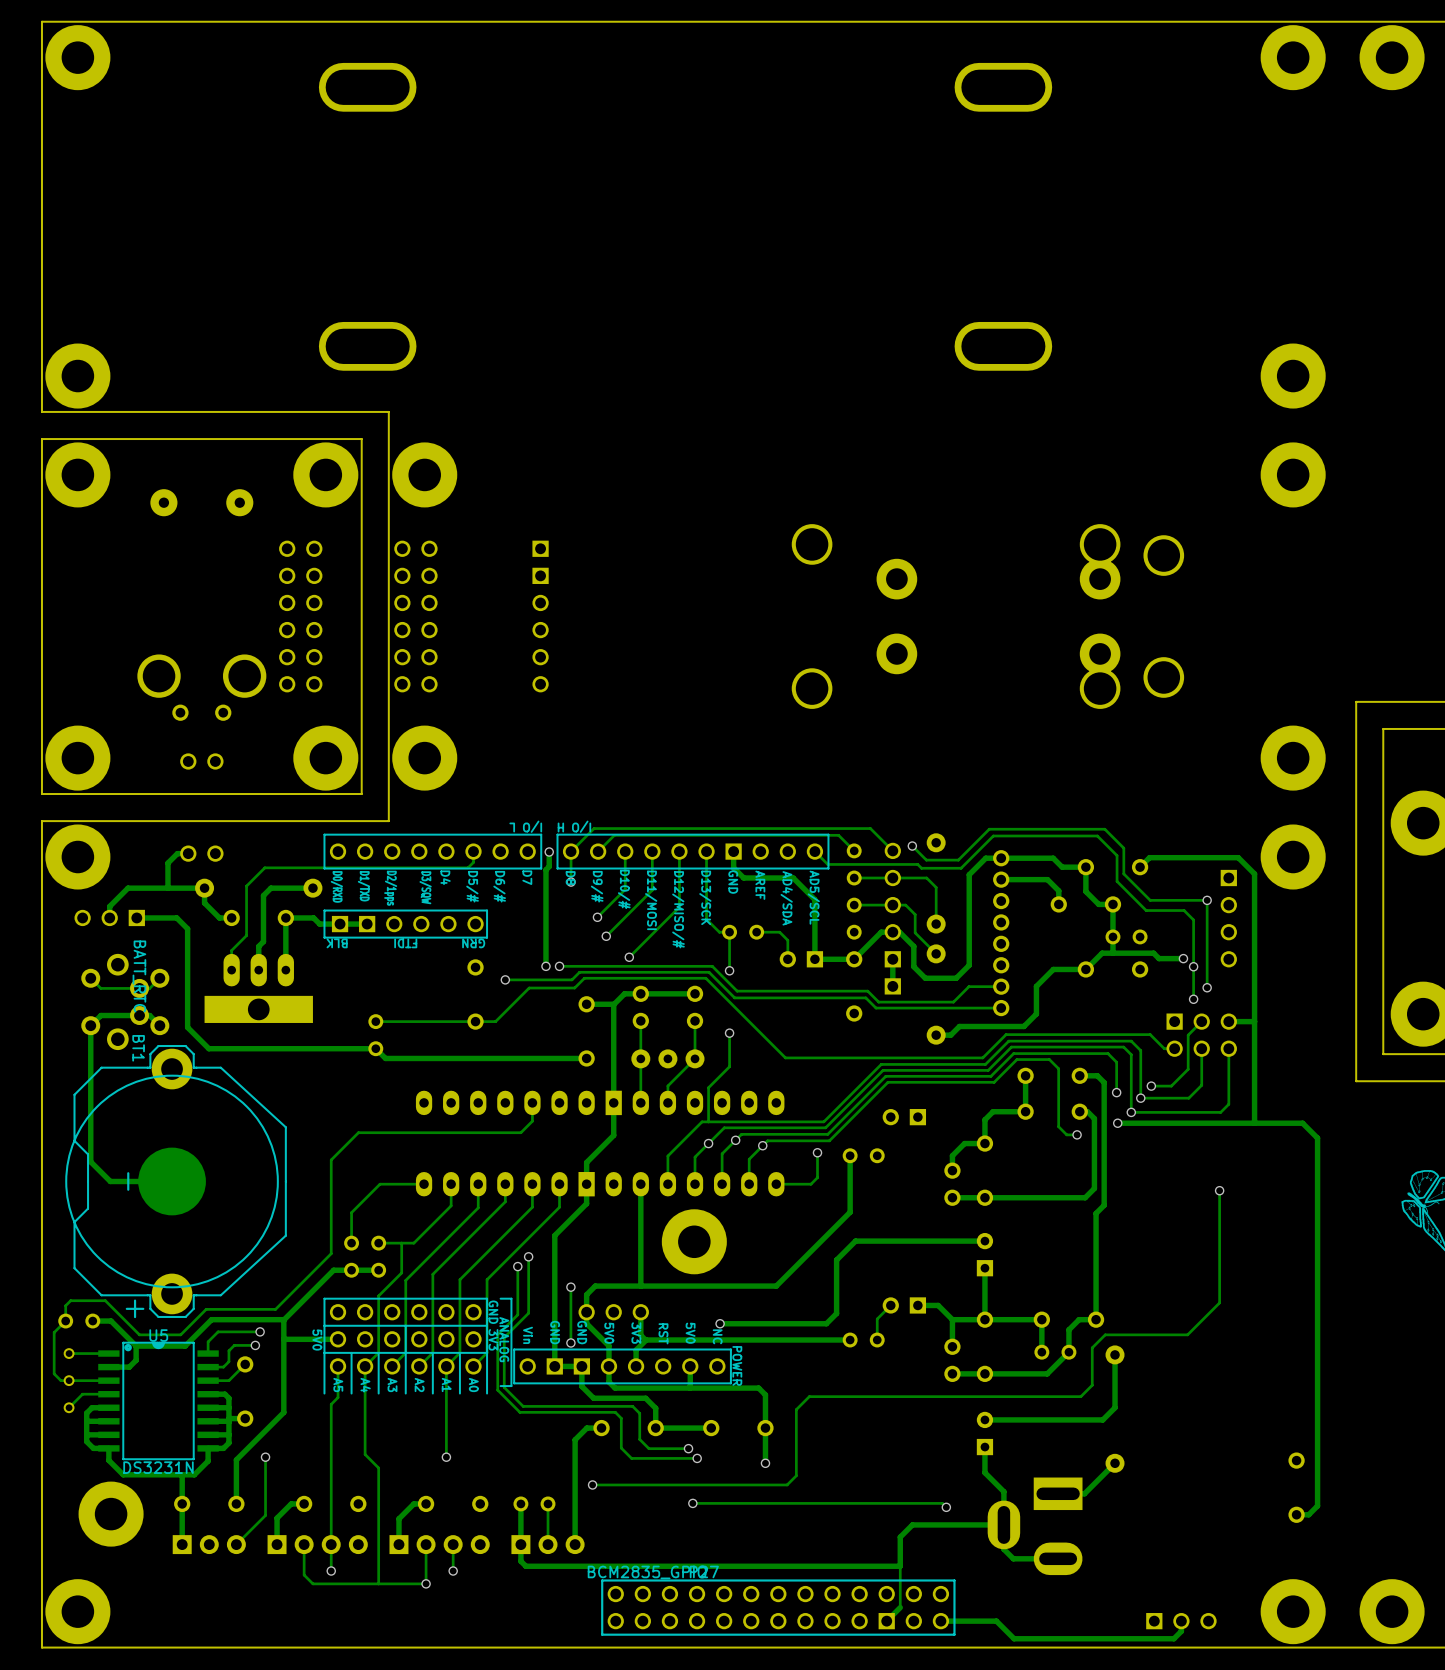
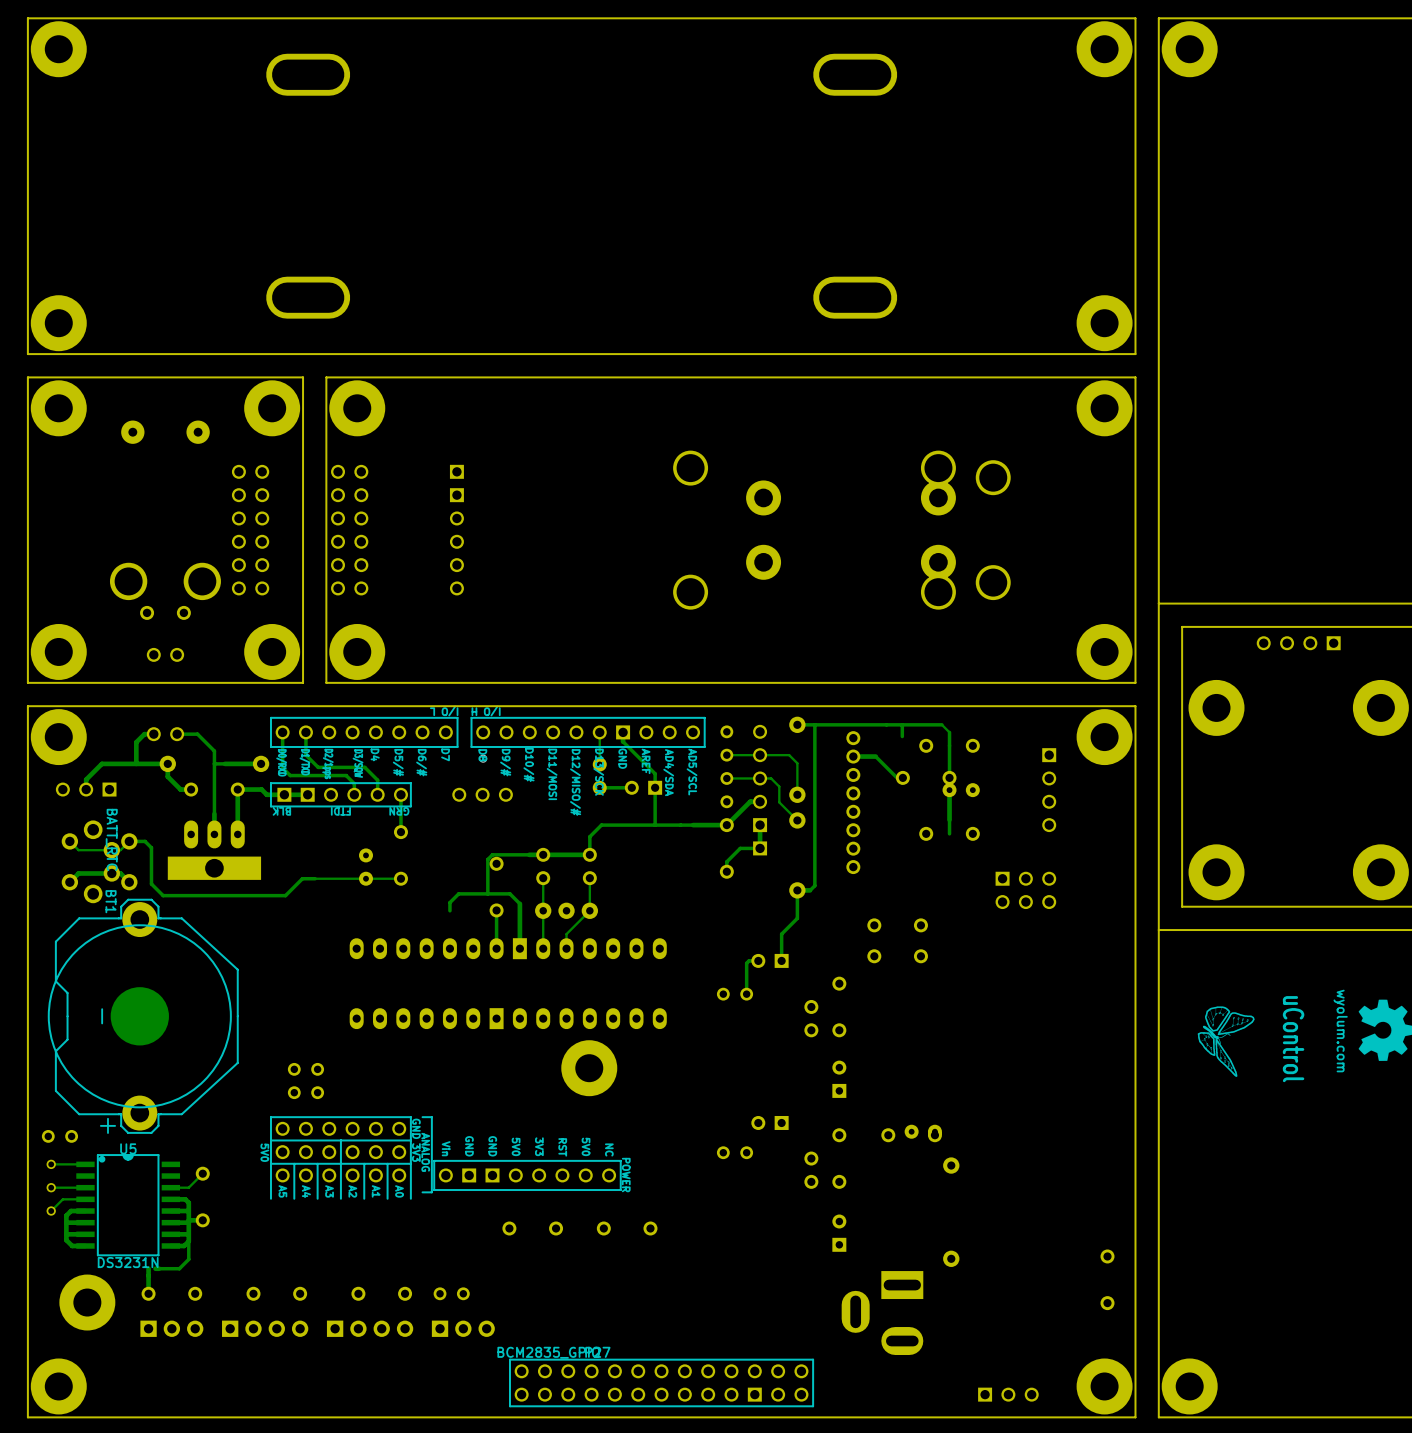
board edge: (1356, 21) (1329, 21) -> (1158, 18) (1158, 603)
board edge: (388, 411) (388, 439) -> (326, 354) (1135, 354) (1135, 18)
board edge: (388, 794) (388, 821) -> (326, 682) (1135, 682) (1135, 377) (326, 377)
board edge: none -> (326, 706) (1135, 706) (1135, 1417)
track: none -> (902, 724) (902, 736)
track: (1104, 842) (1097, 836) (993, 836) (961, 868) (921, 868) (917, 864) (827, 864) (814, 851) -> (941, 724) (797, 724)
track: (912, 846) (926, 860) (958, 860) (989, 829) (1104, 829) (1123, 848) (1123, 873) (1150, 900) (1207, 900) (1207, 987) -> none
via: (912, 846) -> none
track: (854, 850) (838, 835) (614, 835) (598, 851) -> none
track: (892, 850) (870, 828) (594, 828) (571, 851) (571, 882) -> none
track: none -> (282, 732) (282, 767) (290, 775) (346, 775) (354, 783) (354, 794)
track: none -> (305, 732) (305, 755) (318, 767) (364, 767) (377, 780) (377, 794)
track: (473, 851) (473, 862) (468, 867) (264, 867) (246, 886) (246, 935) (231, 950) (231, 970) -> none
track: (549, 851) (549, 866) (545, 869) (545, 966) -> none
via: (549, 851) -> none
track: (625, 851) (625, 889) (597, 917) -> none
track: (652, 851) (652, 890) (606, 936) -> none
track: (679, 851) (679, 907) (629, 957) -> none
track: (1112, 851) (1117, 855) (1117, 881) (1146, 910) (1184, 910) (1193, 920) (1193, 999) -> (949, 732) (949, 777)
track: none -> (177, 734) (197, 734) (214, 751) (214, 814)
track: (733, 862) (733, 867) (743, 878) (793, 878) (814, 899) (814, 959) -> (623, 741) (655, 773) (655, 825)
track: (1140, 867) (1149, 857) (1238, 857) (1254, 873) (1254, 1123) -> none
track: (1027, 879) (1047, 879) (1058, 890) (1058, 904) -> (875, 756) (902, 783)
track: (270, 888) (263, 895) (263, 941) (258, 946) -> (224, 763) (214, 763)
track: (706, 888) (706, 919) (719, 932) (729, 932) (729, 970) -> none
via: (1207, 900) -> none
part: none -> (599, 776)
track: (1112, 904) (1098, 904) (1085, 891) (1085, 867) (1062, 867) (1053, 858) (985, 858) (969, 874) (969, 965) (956, 978) (925, 978) (913, 966) (913, 946) (899, 932) (892, 932) -> none
track: none -> (631, 787) (599, 787)
track: (136, 917) (176, 917) (187, 928) (187, 1027) (208, 1048) (375, 1048) (385, 1058) (586, 1058) -> (496, 948) (496, 910)
via: (597, 917) -> none
part: none -> (961, 790)
track: none -> (400, 794) (400, 832)
part: none -> (482, 794)
part: (743, 932) -> none
track: (756, 932) (779, 932) (787, 940) (787, 959) -> none
via: (606, 936) -> none
part: (1126, 936) -> none
track: none -> (949, 819) (949, 833)
via: (629, 957) -> none
track: (1183, 958) (1159, 958) (1153, 953) (1102, 953) (1085, 969) (1053, 969) (1036, 986) (1036, 1014) (1023, 1026) (959, 1026) (950, 1035) -> (814, 724) (814, 885) (809, 890)
via: (1183, 958) -> none
part position: (801, 959) -> (643, 787)
track: none -> (693, 825) (601, 825) (589, 836) (589, 854)
via: (545, 966) -> none
track: (559, 966) (712, 966) (737, 991) (867, 991) (878, 1002) (953, 1002) (968, 986) (1001, 986) -> none
via: (559, 966) -> none
via: (1193, 966) -> none
via: (729, 970) -> none
track: none -> (129, 841) (145, 841) (151, 847) (151, 883) (163, 895) (285, 895) (302, 878) (315, 878)
track: (505, 979) (571, 979) (579, 972) (709, 972) (734, 997) (865, 997) (876, 1008) (1001, 1008) -> none
via: (505, 979) -> none
track: none -> (760, 848) (740, 848) (726, 861) (726, 871)
via: (1207, 987) -> none
track: (624, 993) (613, 1004) (613, 1050) -> (529, 854) (492, 854) (487, 859) (487, 893)
via: (1193, 999) -> none
track: (614, 1004) (586, 1004) -> none
part: none -> (366, 867)
track: (475, 1021) (495, 1021) (529, 988) (574, 988) (584, 978) (705, 978) (785, 1057) (982, 1057) (1006, 1034) (1150, 1034) (1164, 1048) (1174, 1048) -> none
track: (1201, 1021) (1188, 1035) (1188, 1069) (1171, 1086) (1151, 1086) -> none
track: (1254, 1021) (1228, 1021) -> none
track: (90, 1025) (90, 1161) (110, 1181) (172, 1181) -> none
track: (729, 1033) (729, 1066) (708, 1087) (708, 1121) -> none
via: (729, 1033) -> none
part: (375, 1035) -> none
track: none -> (797, 890) (797, 918) (781, 934) (781, 960)
track: (1201, 1048) (1201, 1085) (1188, 1098) (1140, 1098) (1140, 1050) (1131, 1041) (1008, 1041) (985, 1064) (881, 1064) (823, 1121) (702, 1121) (667, 1156) (667, 1184) -> none
track: (1228, 1048) (1228, 1104) (1220, 1112) (1131, 1112) (1131, 1054) (1123, 1047) (1011, 1047) (988, 1070) (883, 1070) (825, 1127) (724, 1127) (695, 1157) (695, 1184) -> none
track: none -> (519, 903) (509, 893) (458, 893) (449, 902) (449, 910)
track: (1025, 1075) (1025, 1111) (993, 1111) (984, 1119) (984, 1143) (964, 1143) (952, 1155) (952, 1170) -> none
track: (1079, 1075) (1097, 1075) (1104, 1082) (1104, 1205) (1096, 1213) (1096, 1319) (1079, 1319) (1068, 1329) (1068, 1352) (1047, 1373) (952, 1373) -> none
via: (1151, 1086) -> none
track: (1116, 1092) (1116, 1062) (1107, 1053) (1013, 1053) (990, 1076) (885, 1076) (827, 1134) (741, 1134) (722, 1153) (722, 1184) -> none
via: (1116, 1092) -> none
via: (1140, 1098) -> none
track: (532, 1102) (532, 1121) (520, 1132) (358, 1132) (331, 1159) (331, 1253) (275, 1309) (206, 1309) (180, 1334) (139, 1334) (105, 1300) (70, 1300) (65, 1305) (65, 1321) (54, 1332) (54, 1373) (60, 1380) (69, 1380) -> none
track: (613, 1102) (613, 1135) (586, 1162) (586, 1203) (554, 1235) (554, 1366) (581, 1366) (581, 1386) (593, 1398) (645, 1398) (655, 1408) (655, 1428) (711, 1428) -> none
track: (1079, 1111) (1087, 1111) (1094, 1118) (1094, 1188) (1085, 1197) (952, 1197) -> none
via: (1131, 1112) -> none
track: none -> (758, 960) (748, 960) (746, 963) (746, 994)
track: (1117, 1123) (1302, 1123) (1317, 1138) (1317, 1505) (1308, 1514) (1296, 1514) -> none
via: (1117, 1123) -> none
track: (1077, 1134) (1066, 1134) (1058, 1126) (1058, 1068) (1049, 1059) (1016, 1059) (994, 1082) (887, 1082) (829, 1140) (767, 1140) (749, 1159) (749, 1184) -> none
via: (1077, 1134) -> none
via: (735, 1140) -> none
via: (708, 1143) -> none
via: (762, 1145) -> none
track: (817, 1152) (817, 1177) (810, 1184) (776, 1184) -> none
via: (817, 1152) -> none
track: (850, 1155) (850, 1212) (776, 1286) (595, 1286) (586, 1294) (586, 1323) (608, 1345) (608, 1382) (615, 1388) (758, 1388) (765, 1394) (765, 1463) -> none
track: (424, 1184) (380, 1184) (351, 1212) (351, 1243) -> none
track: (451, 1184) (451, 1205) (413, 1243) (378, 1243) -> none
track: (478, 1184) (478, 1207) (405, 1280) (405, 1352) (392, 1366) -> none
track: (505, 1184) (505, 1201) (432, 1274) (432, 1352) (419, 1366) -> none
track: (532, 1184) (532, 1207) (459, 1279) (459, 1352) (446, 1366) (446, 1457) -> none
track: (559, 1184) (559, 1207) (487, 1279) (487, 1352) (473, 1366) -> none
track: (640, 1184) (640, 1286) -> none
track: (1219, 1190) (1219, 1302) (1187, 1334) (1105, 1334) (1092, 1347) (1092, 1385) (1080, 1396) (809, 1396) (796, 1409) (796, 1475) (787, 1484) (592, 1484) -> none
via: (1219, 1190) -> none
track: (984, 1241) (855, 1241) (836, 1260) (836, 1313) (826, 1323) (720, 1323) -> none
track: (401, 1243) (401, 1272) (378, 1295) (378, 1352) (365, 1366) (365, 1454) (378, 1468) (378, 1583) -> none
track: (528, 1256) (528, 1313) (504, 1337) (504, 1387) (523, 1406) (632, 1406) (639, 1413) (639, 1439) (648, 1448) (688, 1448) -> none
via: (528, 1256) -> none
track: (517, 1266) (517, 1314) (497, 1334) (497, 1390) (519, 1412) (615, 1412) (621, 1418) (621, 1448) (631, 1458) (697, 1458) -> none
via: (517, 1266) -> none
track: (984, 1268) (984, 1319) -> none
track: (378, 1270) (333, 1270) (283, 1320) -> none
track: (570, 1287) (570, 1342) -> none
via: (570, 1287) -> none
track: (890, 1305) (877, 1319) (877, 1340) -> none
track: (917, 1305) (938, 1305) (952, 1319) -> none
part: (613, 1312) -> none
track: (640, 1312) (640, 1335) (645, 1340) (850, 1340) -> none
part: none -> (923, 1131)
track: (952, 1319) (1041, 1319) (1041, 1352) -> none
track: (952, 1319) (952, 1346) -> none
track: (92, 1321) (111, 1321) (136, 1346) -> none
via: (720, 1323) -> none
track: (260, 1331) (218, 1331) (208, 1341) (208, 1353) -> none
via: (260, 1331) -> none
track: (338, 1339) (283, 1339) -> none
track: (646, 1340) (636, 1350) (636, 1366) -> none
via: (570, 1342) -> none
track: (255, 1345) (234, 1345) (228, 1350) (228, 1361) (223, 1367) (208, 1367) -> none
via: (255, 1345) -> none
track: (136, 1346) (185, 1346) (211, 1319) (283, 1319) (283, 1412) (236, 1459) (236, 1503) -> none
track: (136, 1346) (136, 1360) (129, 1367) (108, 1367) -> none
part: (1055, 1352) -> none
track: (1115, 1354) (1115, 1407) (1102, 1419) (984, 1419) -> none
track: (338, 1366) (338, 1397) (331, 1404) (331, 1571) -> none
track: (690, 1366) (690, 1388) -> none
track: (601, 1428) (586, 1428) (575, 1439) (575, 1544) -> none
track: (984, 1447) (984, 1472) (1003, 1491) (1003, 1549) (1013, 1558) (1058, 1558) -> none
track: (108, 1448) (108, 1460) (123, 1474) (190, 1474) -> none
track: (208, 1448) (208, 1461) (194, 1474) -> (188, 1241) (188, 1259) (179, 1268) (159, 1268)
via: (688, 1448) -> none
track: (265, 1457) (265, 1515) (236, 1544) -> none
via: (265, 1457) -> none
via: (446, 1457) -> none
via: (697, 1458) -> none
via: (765, 1463) -> none
track: (1115, 1463) (1084, 1493) (1058, 1493) -> none
via: (592, 1484) -> none
track: (182, 1503) (182, 1544) -> none
track: (304, 1503) (291, 1503) (277, 1518) (277, 1544) -> none
track: (426, 1503) (413, 1503) (398, 1518) (398, 1544) -> none
track: (520, 1503) (520, 1561) (525, 1566) (900, 1566) -> none
track: (548, 1503) (548, 1544) -> none
track: (692, 1503) (942, 1503) (946, 1507) -> none
via: (692, 1503) -> none
via: (946, 1507) -> none
track: (1003, 1524) (912, 1524) (900, 1537) (900, 1566) -> none
track: (426, 1544) (426, 1583) (312, 1583) (304, 1575) (304, 1544) -> none
track: (453, 1544) (453, 1571) -> none
track: (900, 1566) (900, 1607) (886, 1621) -> none
via: (331, 1571) -> none
via: (453, 1571) -> none
via: (426, 1583) -> none
track: (1181, 1621) (1181, 1631) (1173, 1638) (1014, 1638) (996, 1621) (940, 1621) -> none
board edge: (1356, 1647) (1329, 1647) -> (1158, 1417) (1158, 930)

